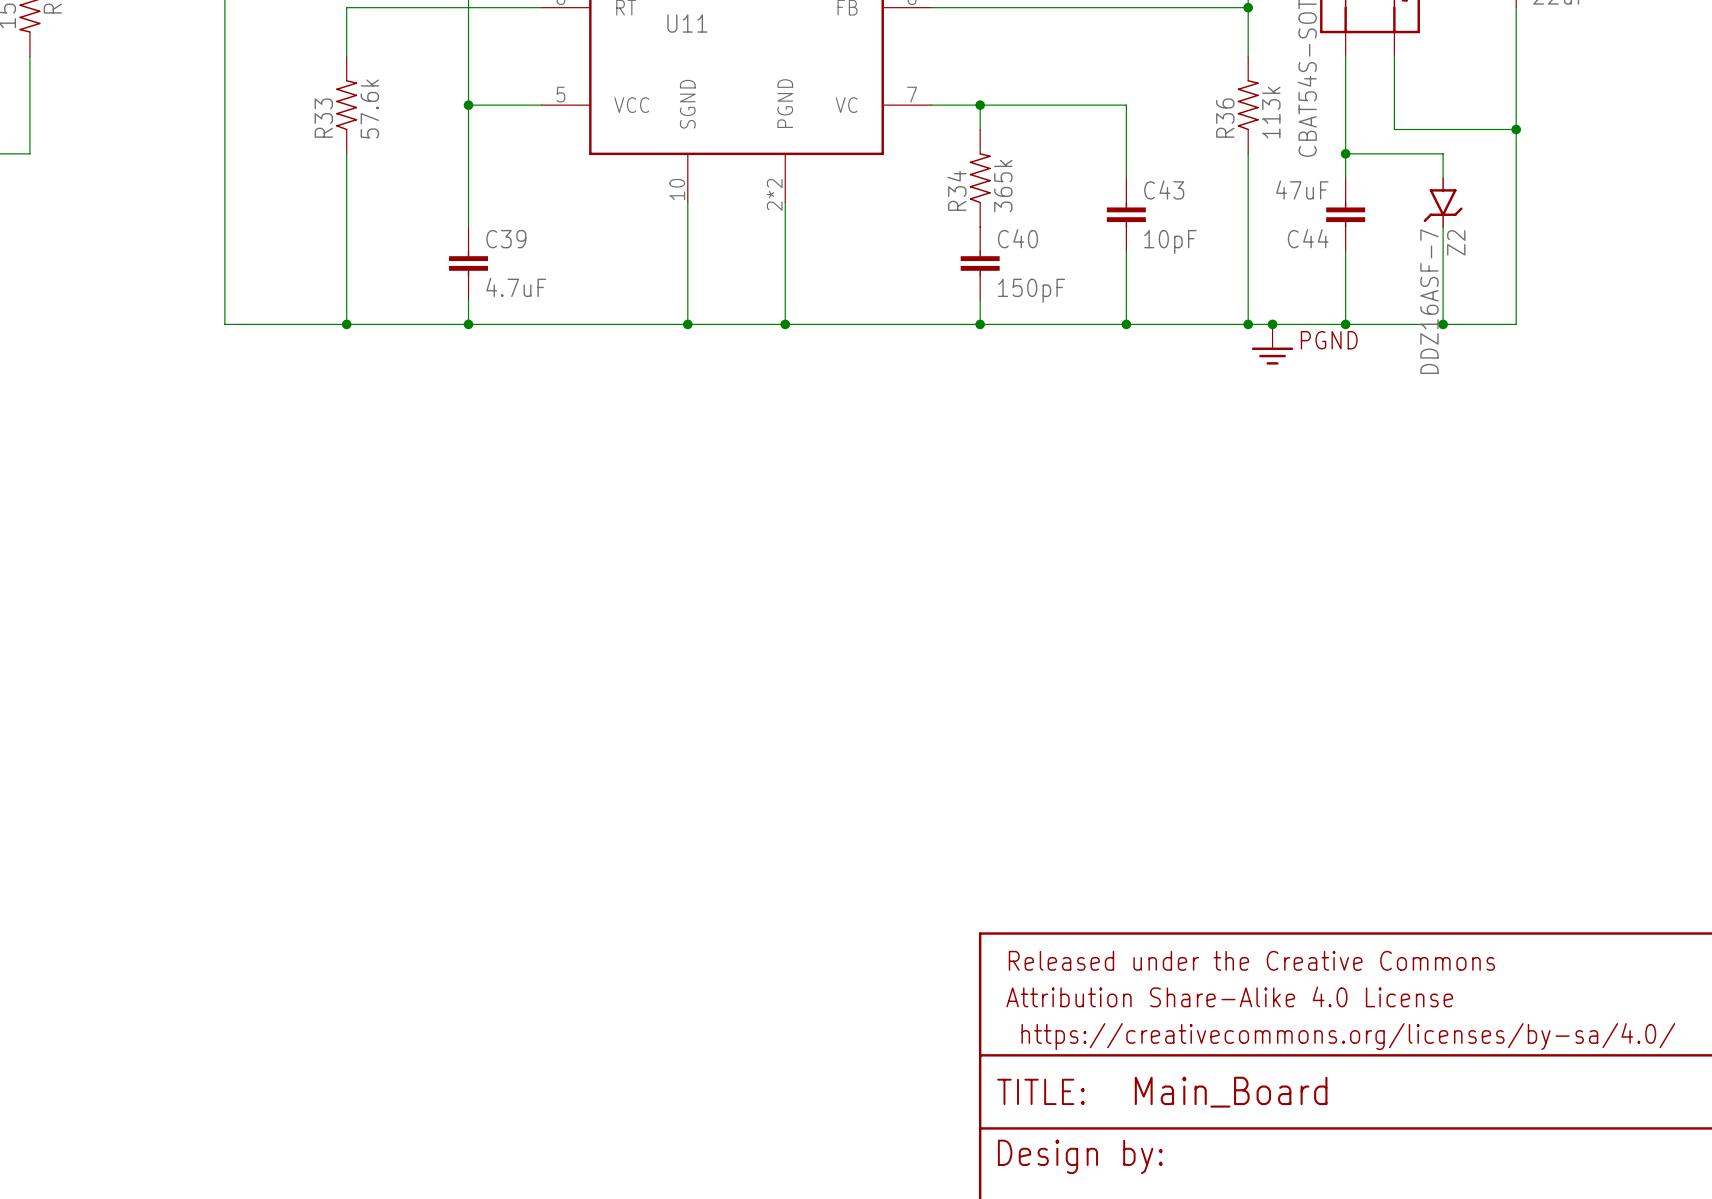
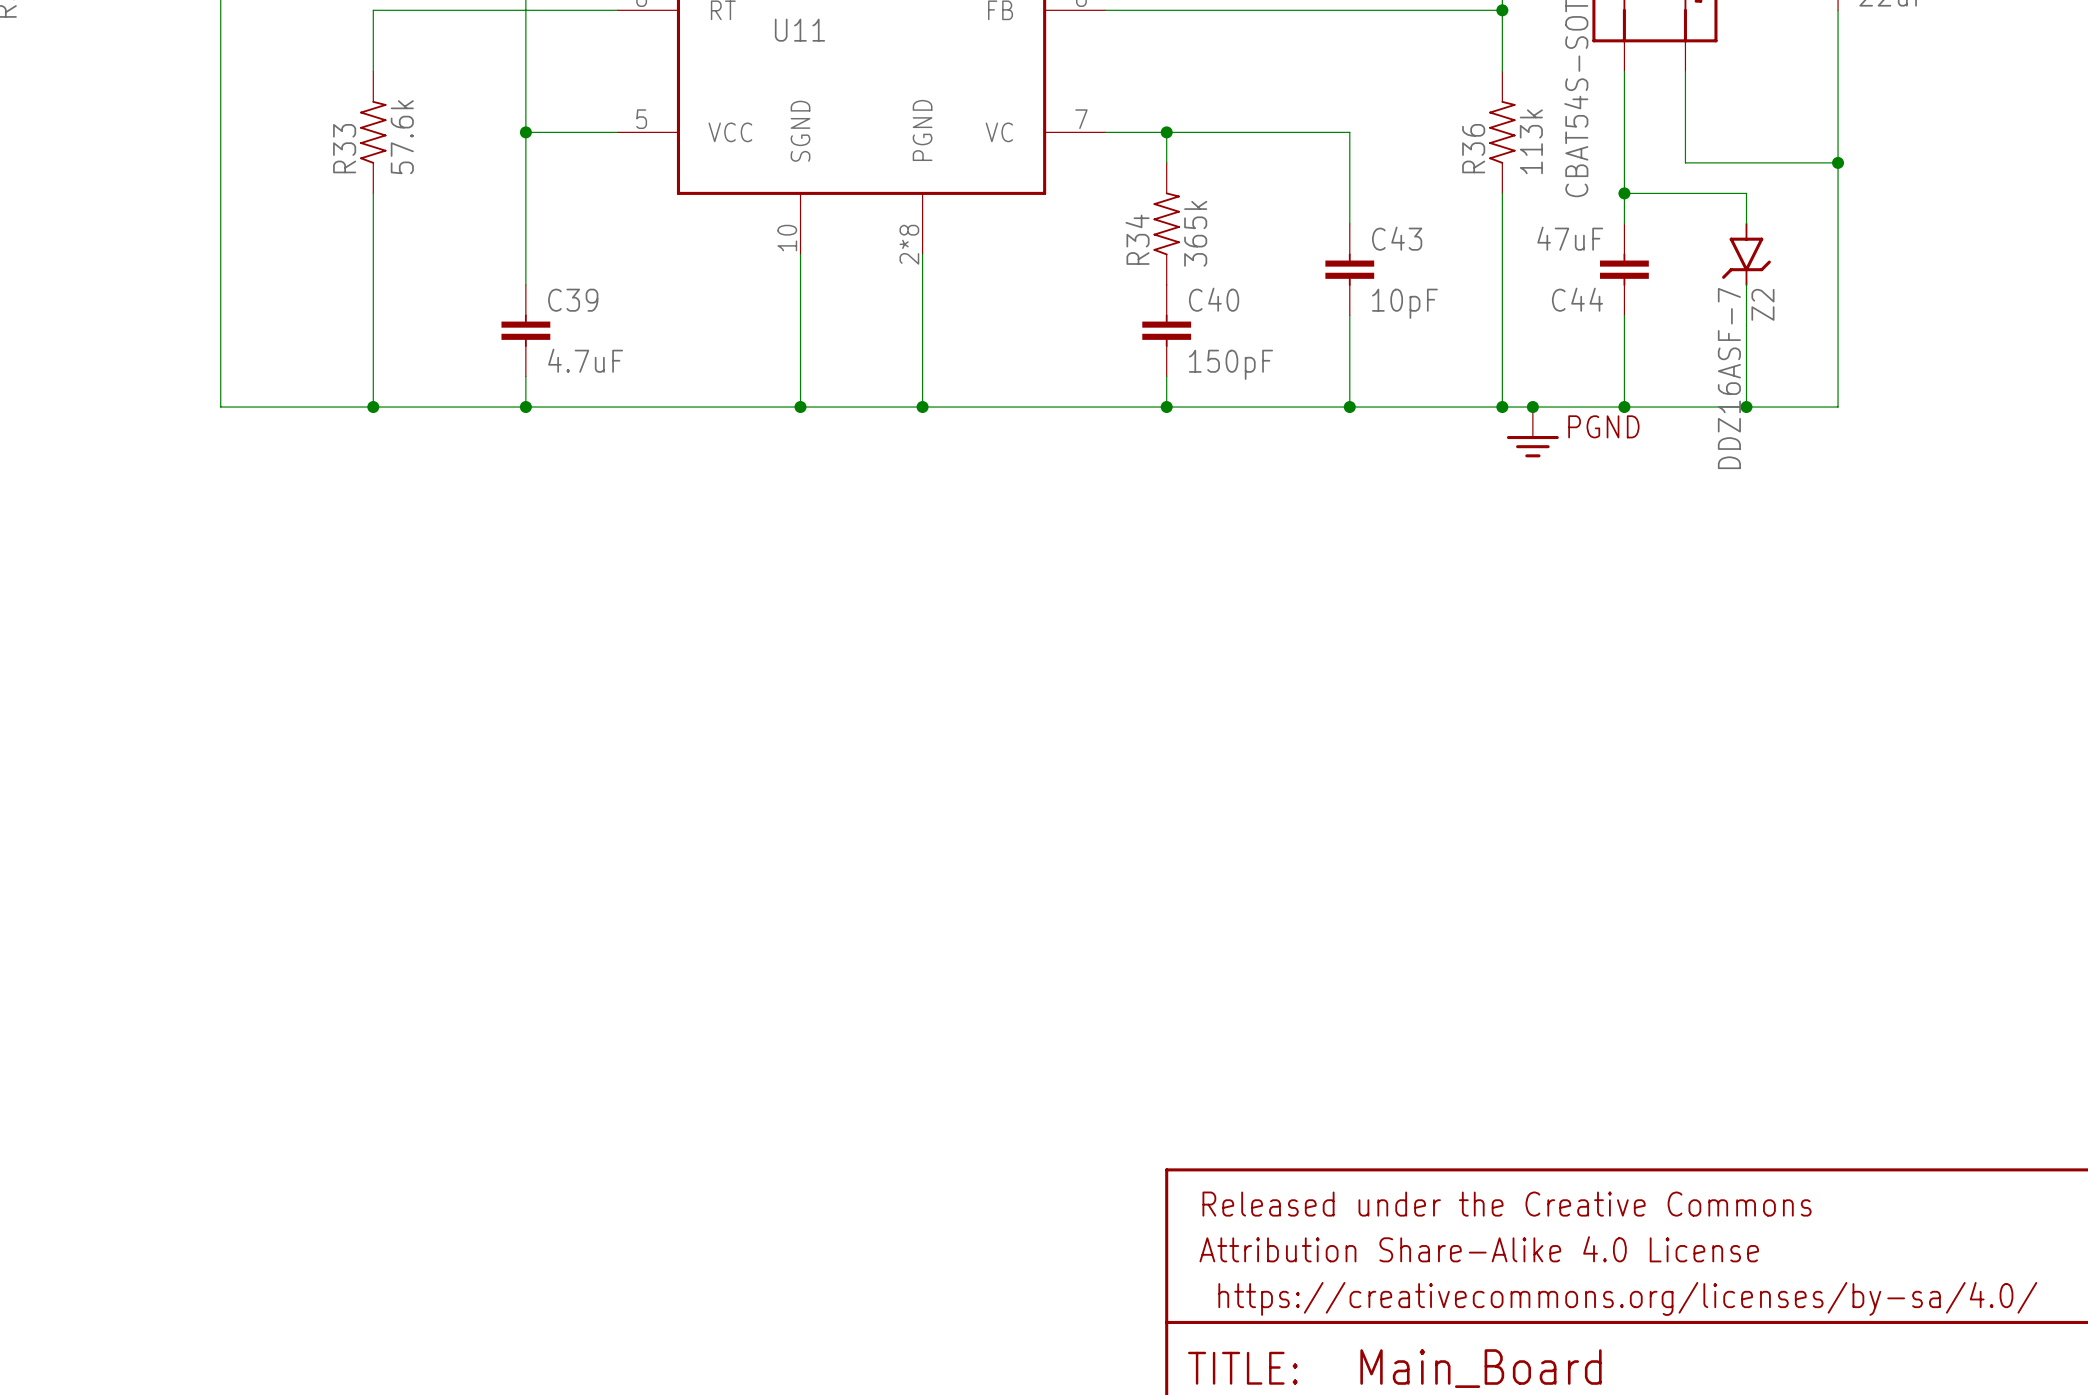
U11 pin number: 2*2 (774, 194) -> 2*8 (909, 244)

